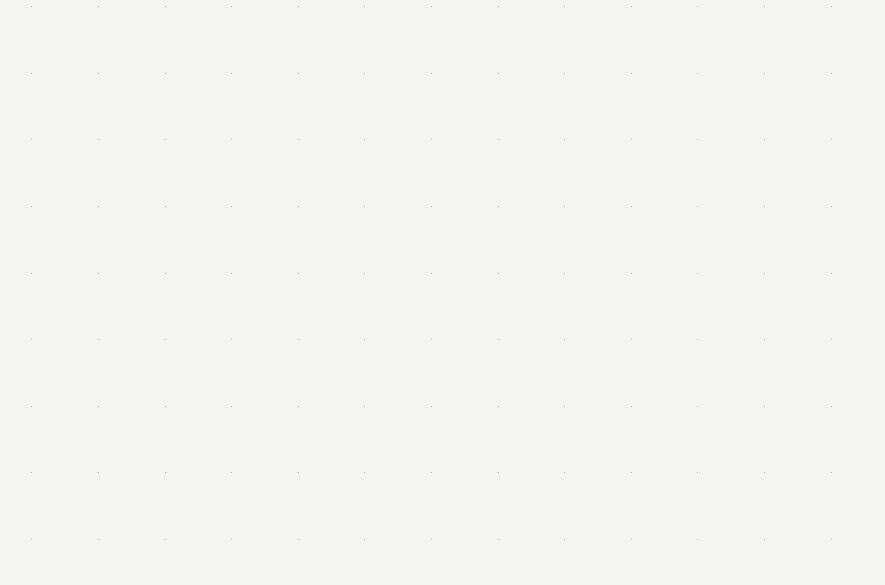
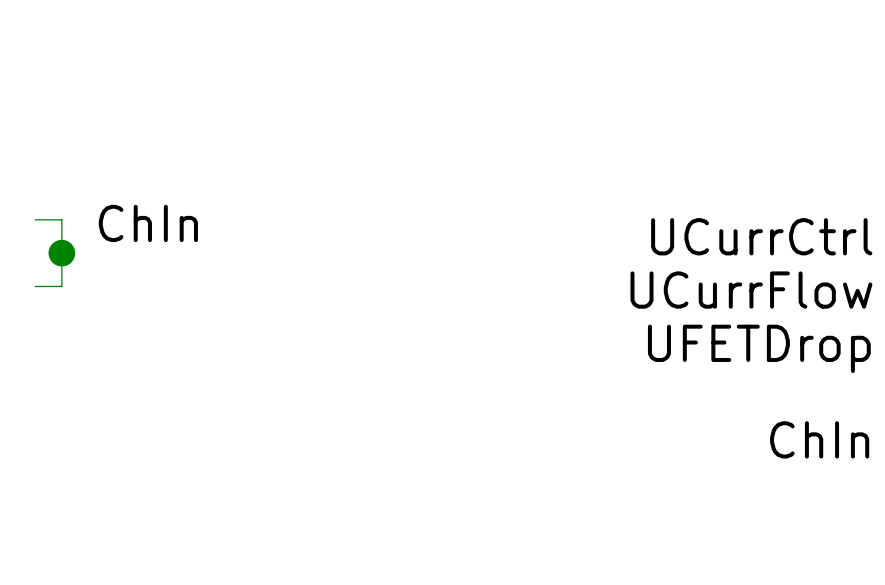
wire: none -> (35, 219) (61, 219) (61, 286) (35, 286)
label: none -> ChIn (148, 223)
label: none -> UCurrCtrl (761, 236)
junction: none -> (61, 253)
label: none -> UCurrFlow (751, 290)
label: none -> UFETDrop (759, 348)
label: none -> ChIn (819, 439)

